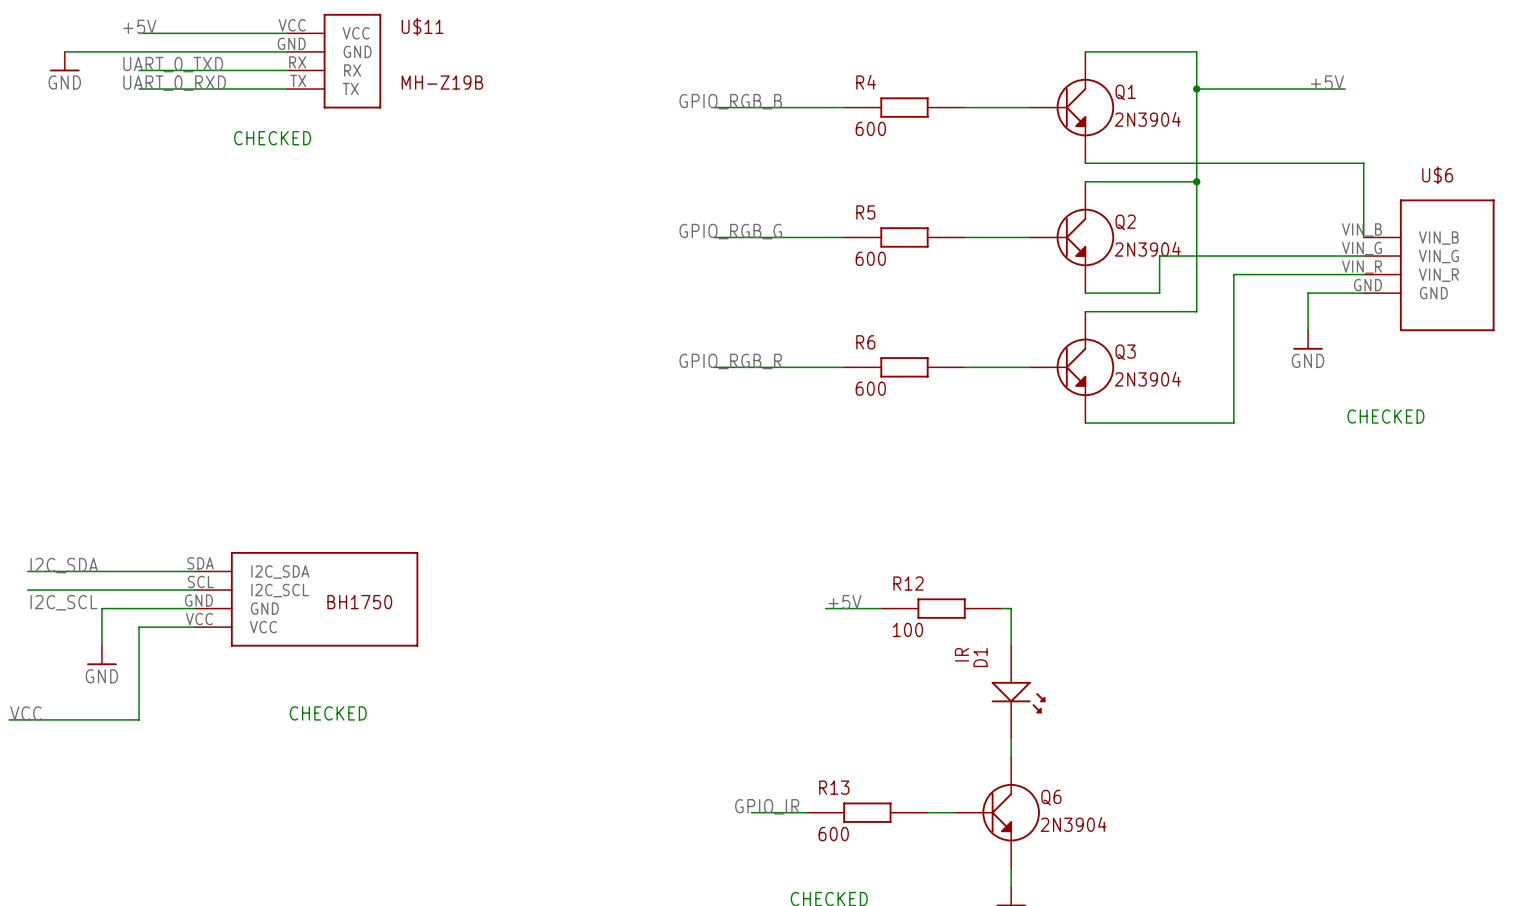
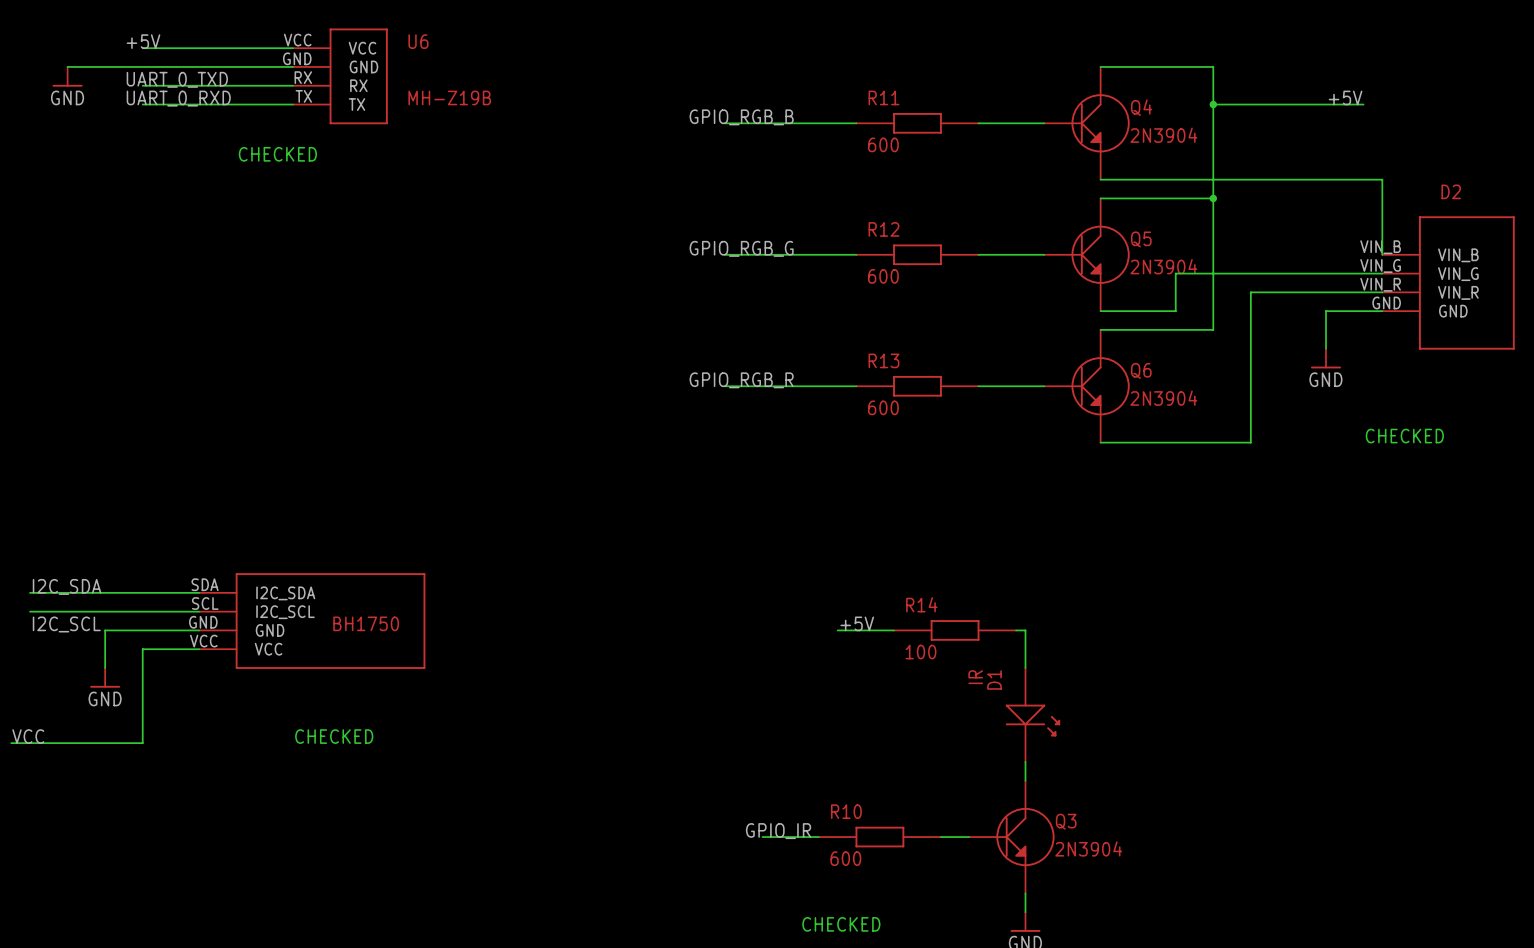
U$11 name: U$11 (422, 26) -> U6 (418, 41)
R4 name: R4 (866, 82) -> R11 (883, 97)
Q1 name: Q1 (1125, 92) -> Q4 (1141, 107)
U$6 name: U$6 (1437, 175) -> D2 (1451, 191)
R5 name: R5 (865, 212) -> R12 (883, 229)
Q2 name: Q2 (1125, 222) -> Q5 (1141, 239)
R6 name: R6 (865, 342) -> R13 (883, 360)
Q3 name: Q3 (1125, 352) -> Q6 (1141, 370)
R12 name: R12 (908, 583) -> R14 (921, 604)
R13 name: R13 (834, 787) -> R10 (846, 811)
Q6 name: Q6 (1051, 797) -> Q3 (1066, 821)

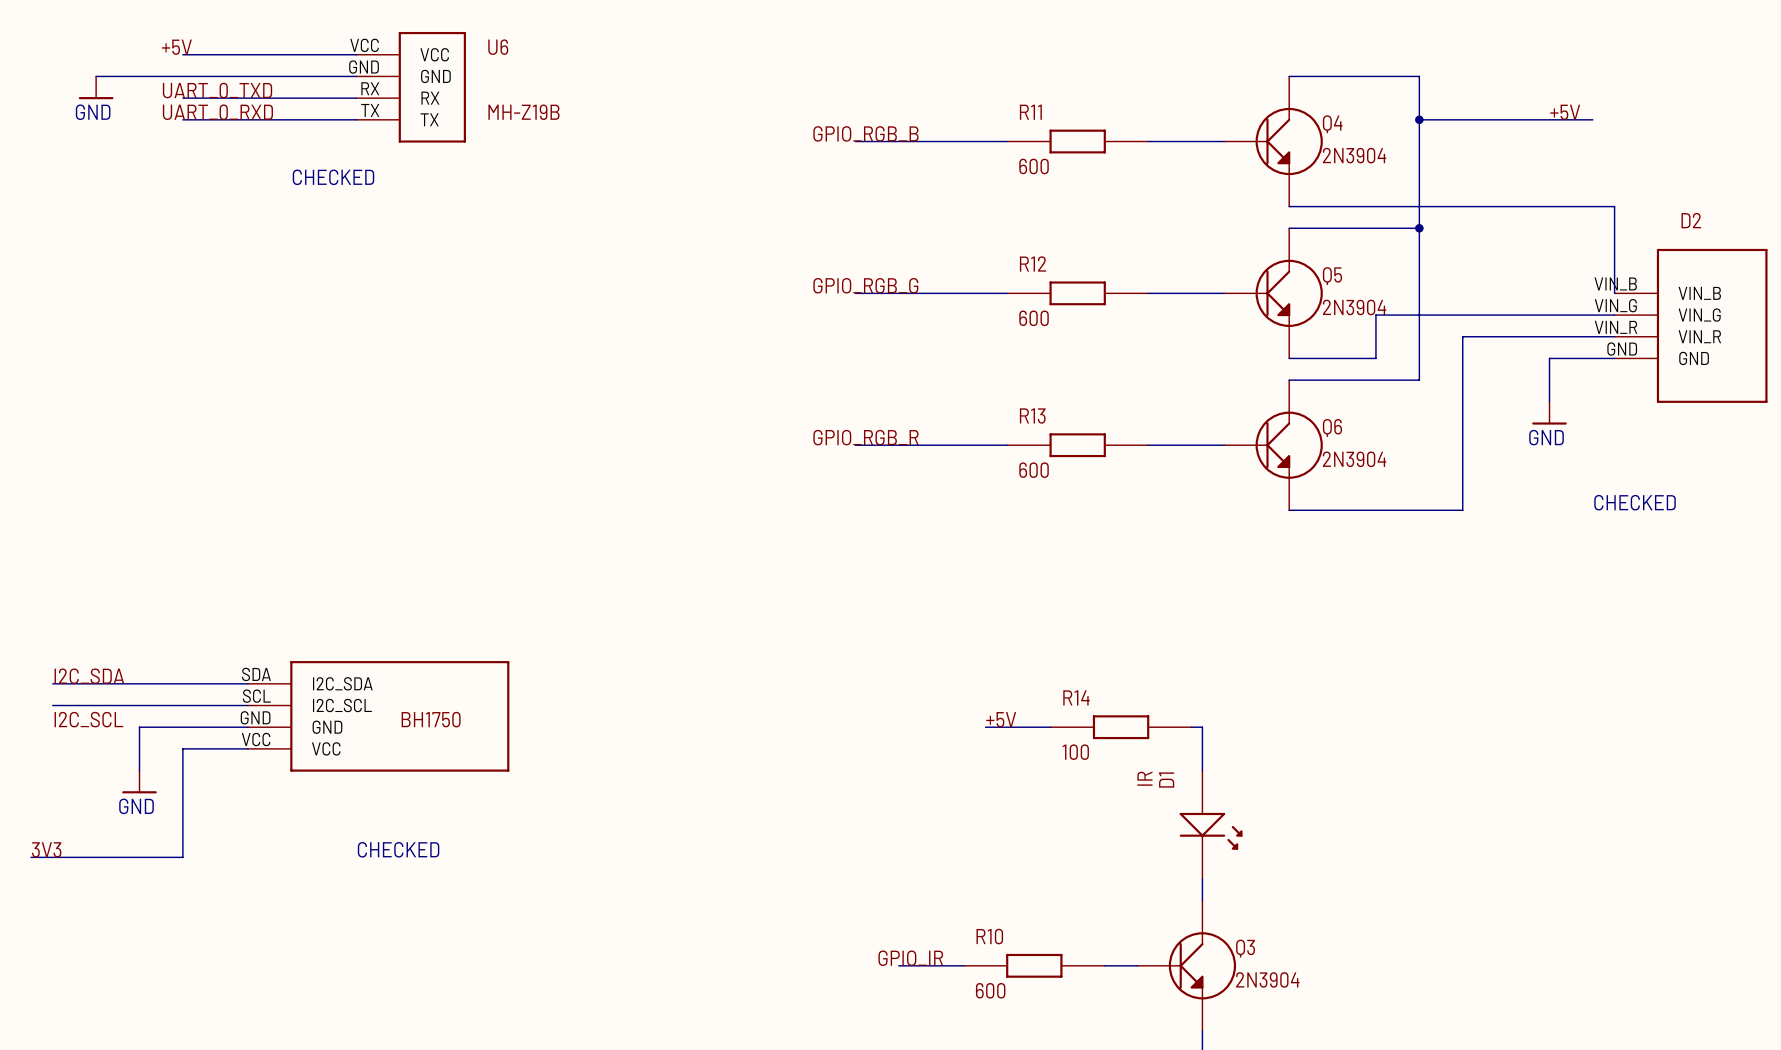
label: VCC (28, 736) -> 3V3 (46, 849)

